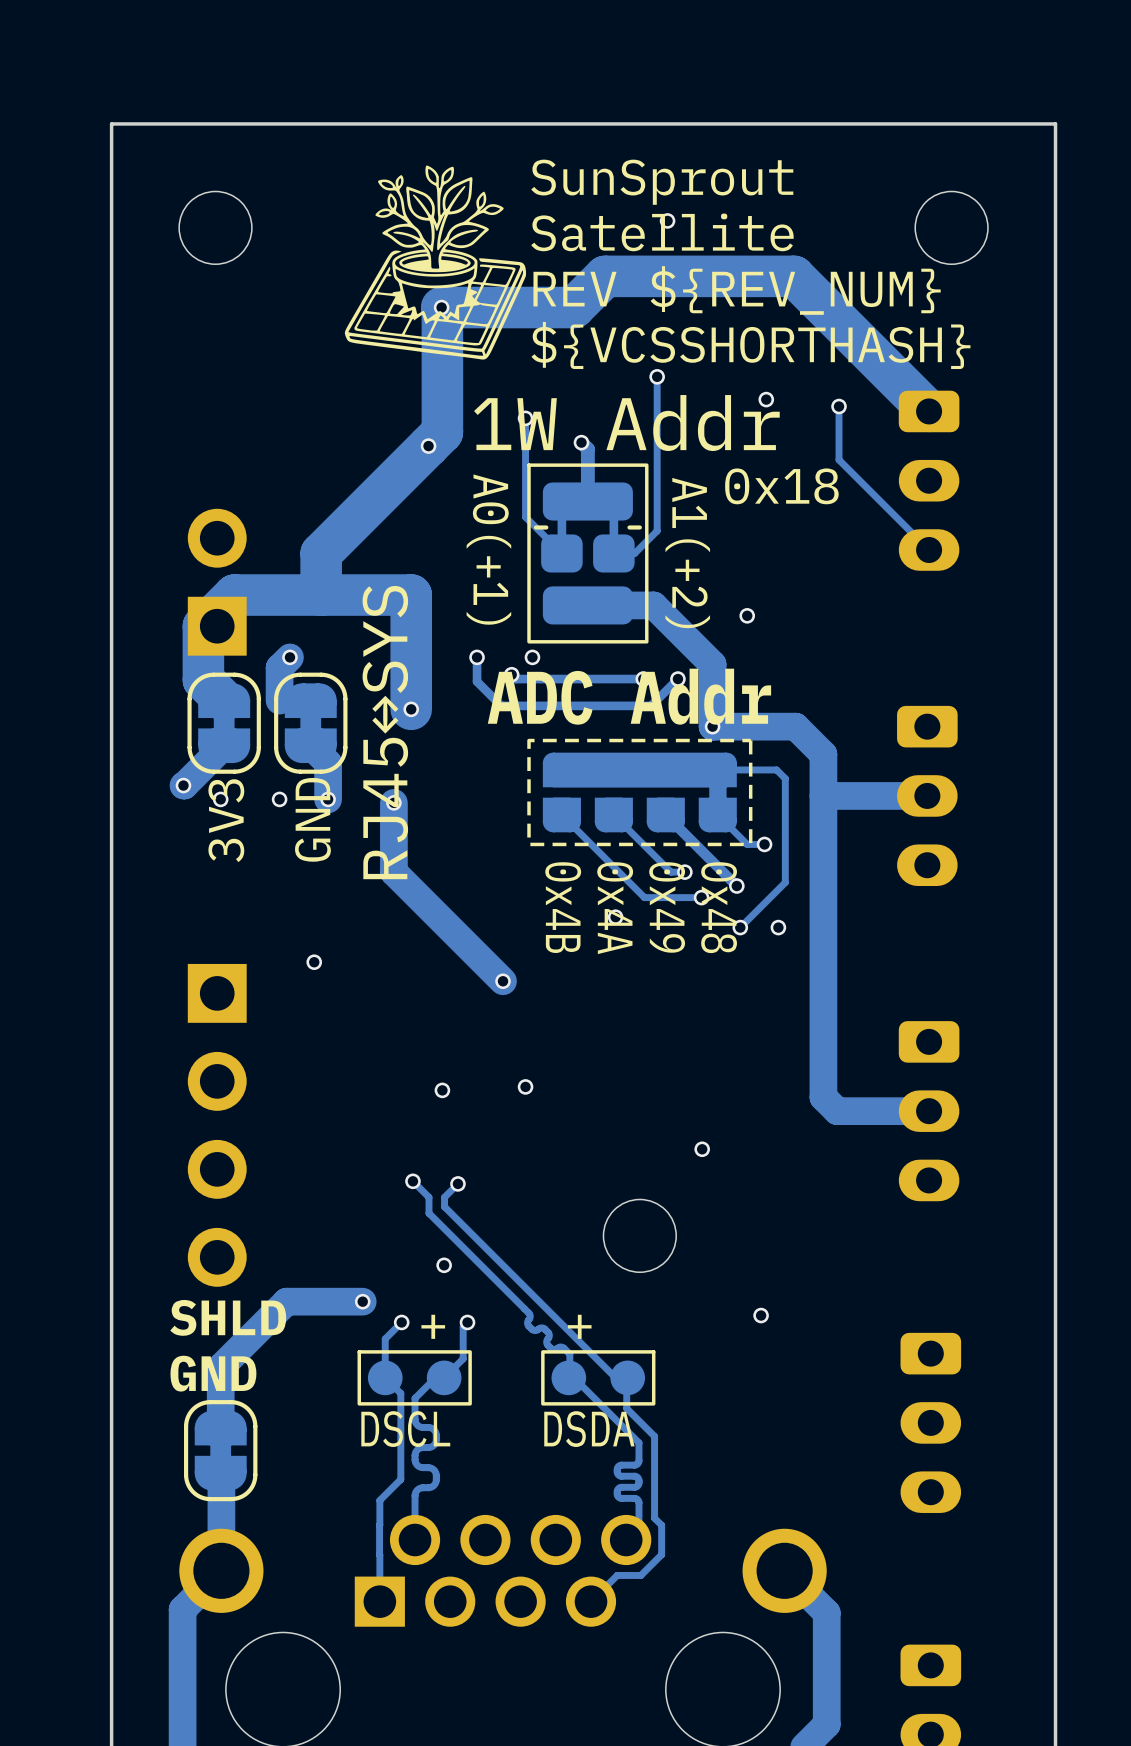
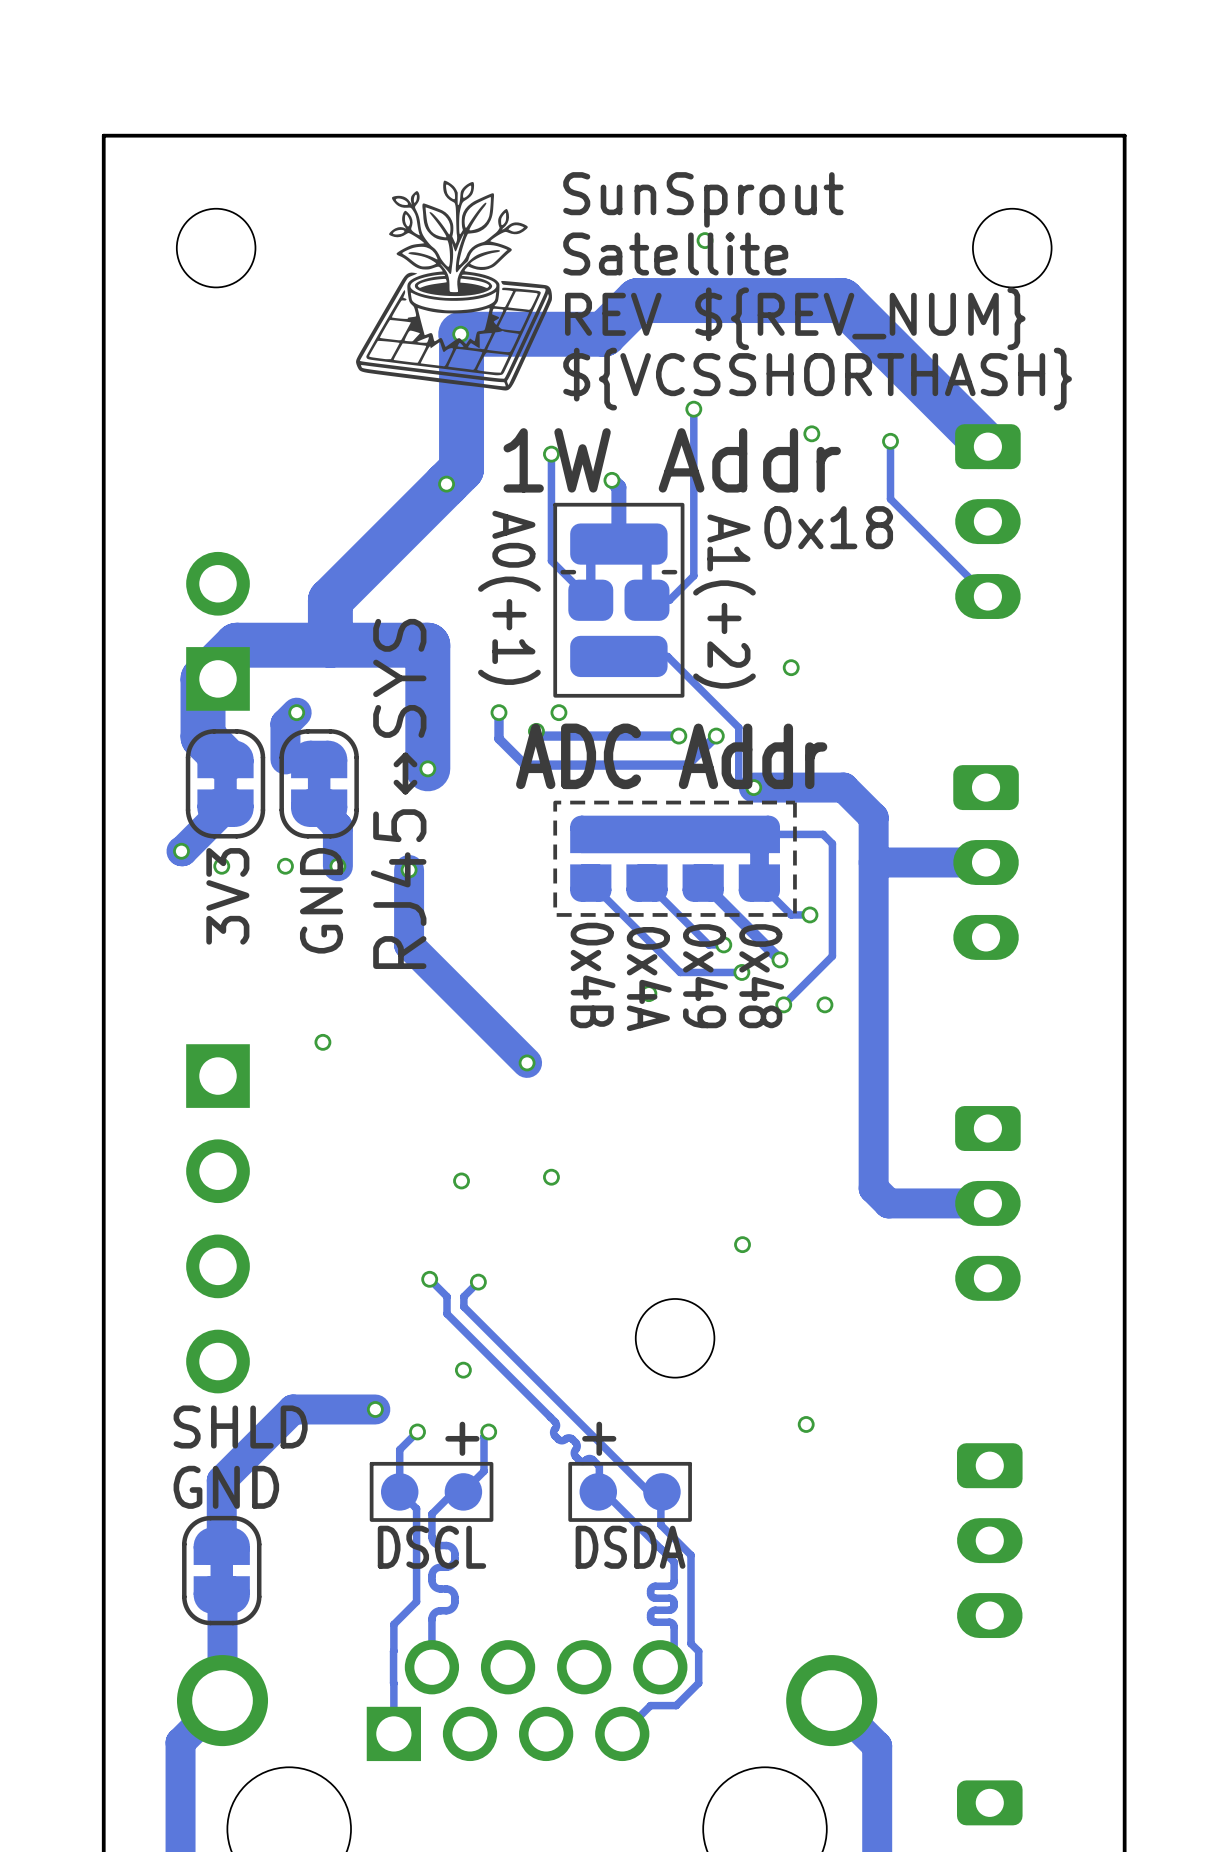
track: (632, 605) (653, 605) (712, 664) (712, 726) -> (667, 656) (738, 727) (738, 780) (746, 787) (753, 787)

